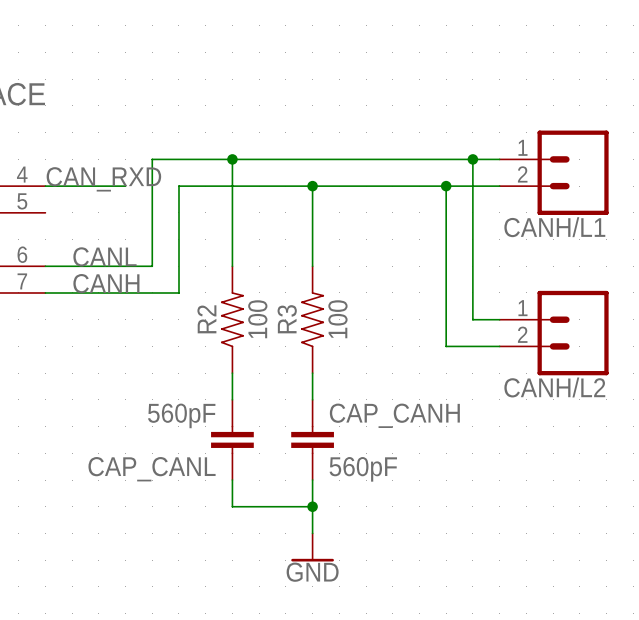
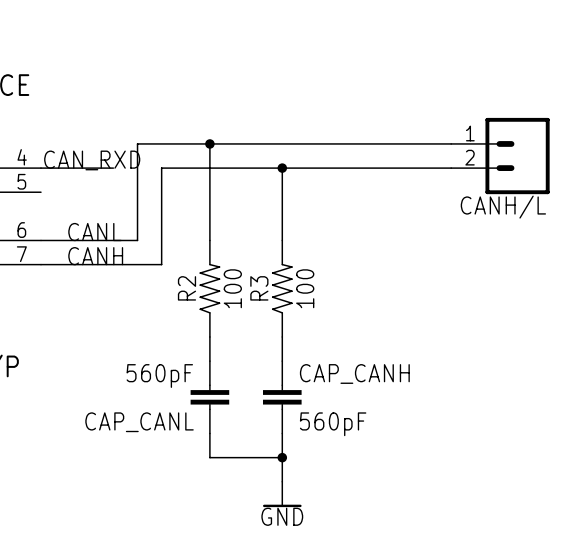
wire: (472, 159) (472, 319) (499, 319) -> none
junction: (472, 159) -> none
wire: (446, 186) (446, 346) (499, 346) -> none
junction: (446, 186) -> none
CANH/L1 name: CANH/L1 (554, 227) -> CANH/L (503, 207)
CANH/L2: (554, 333) -> none

